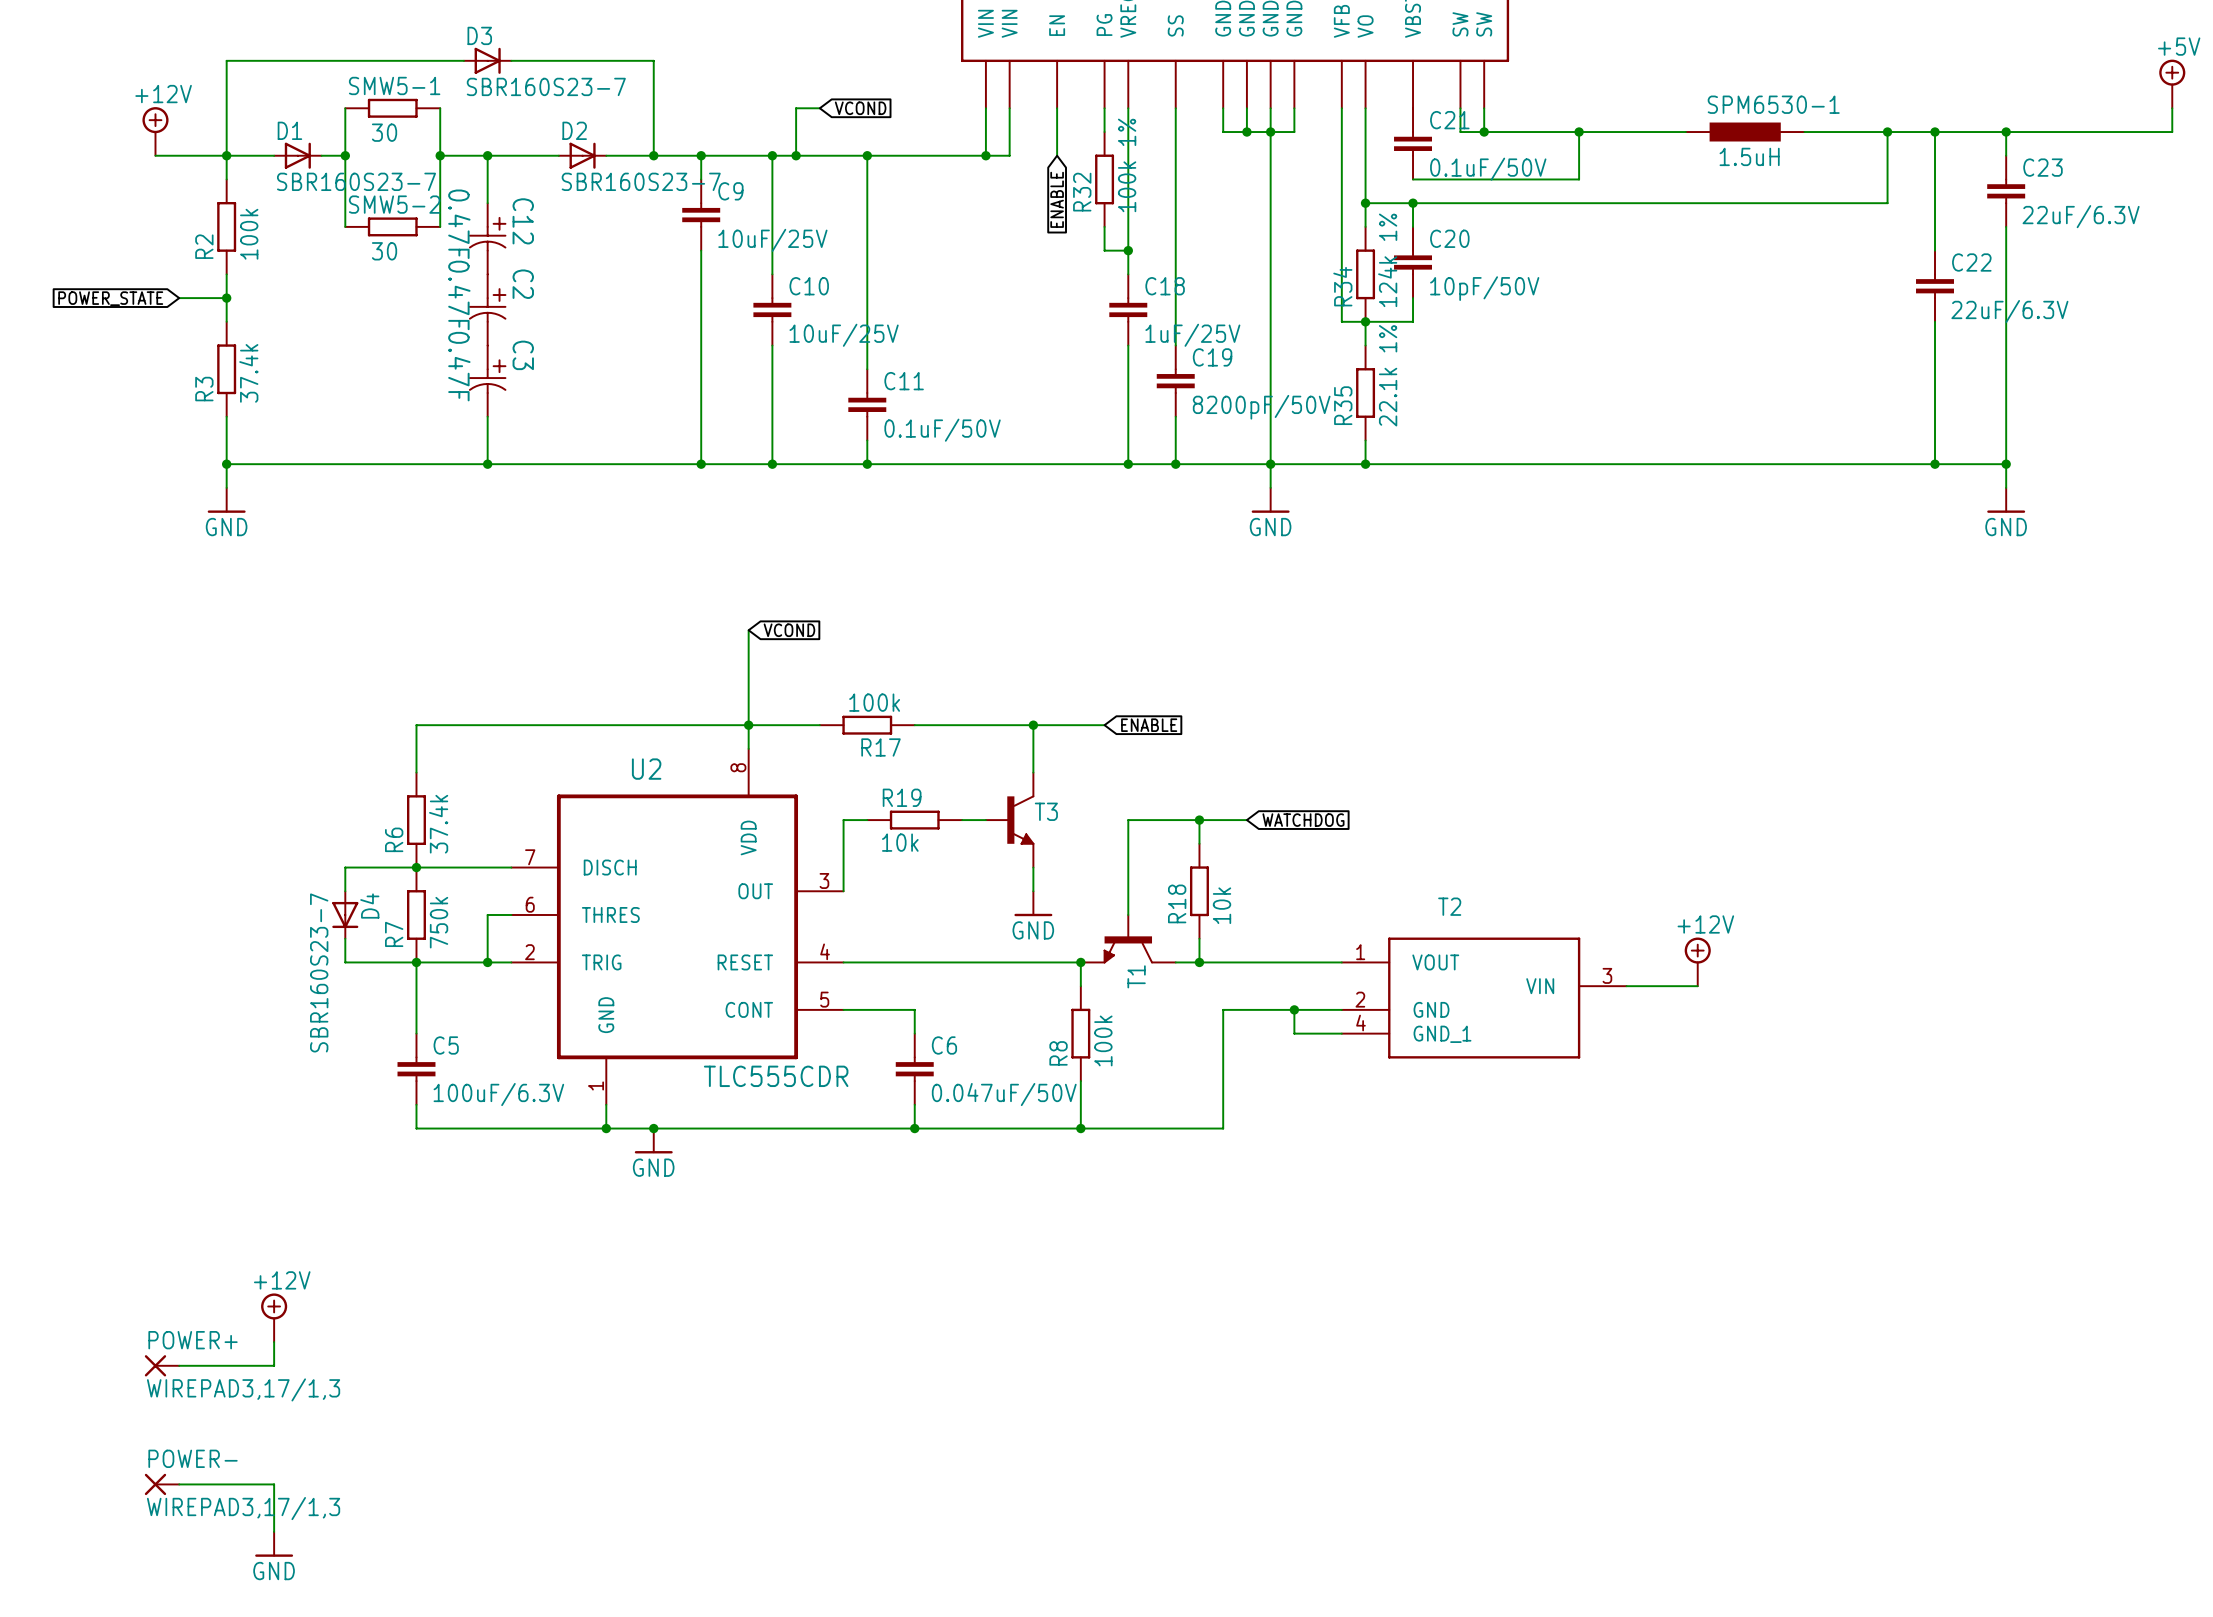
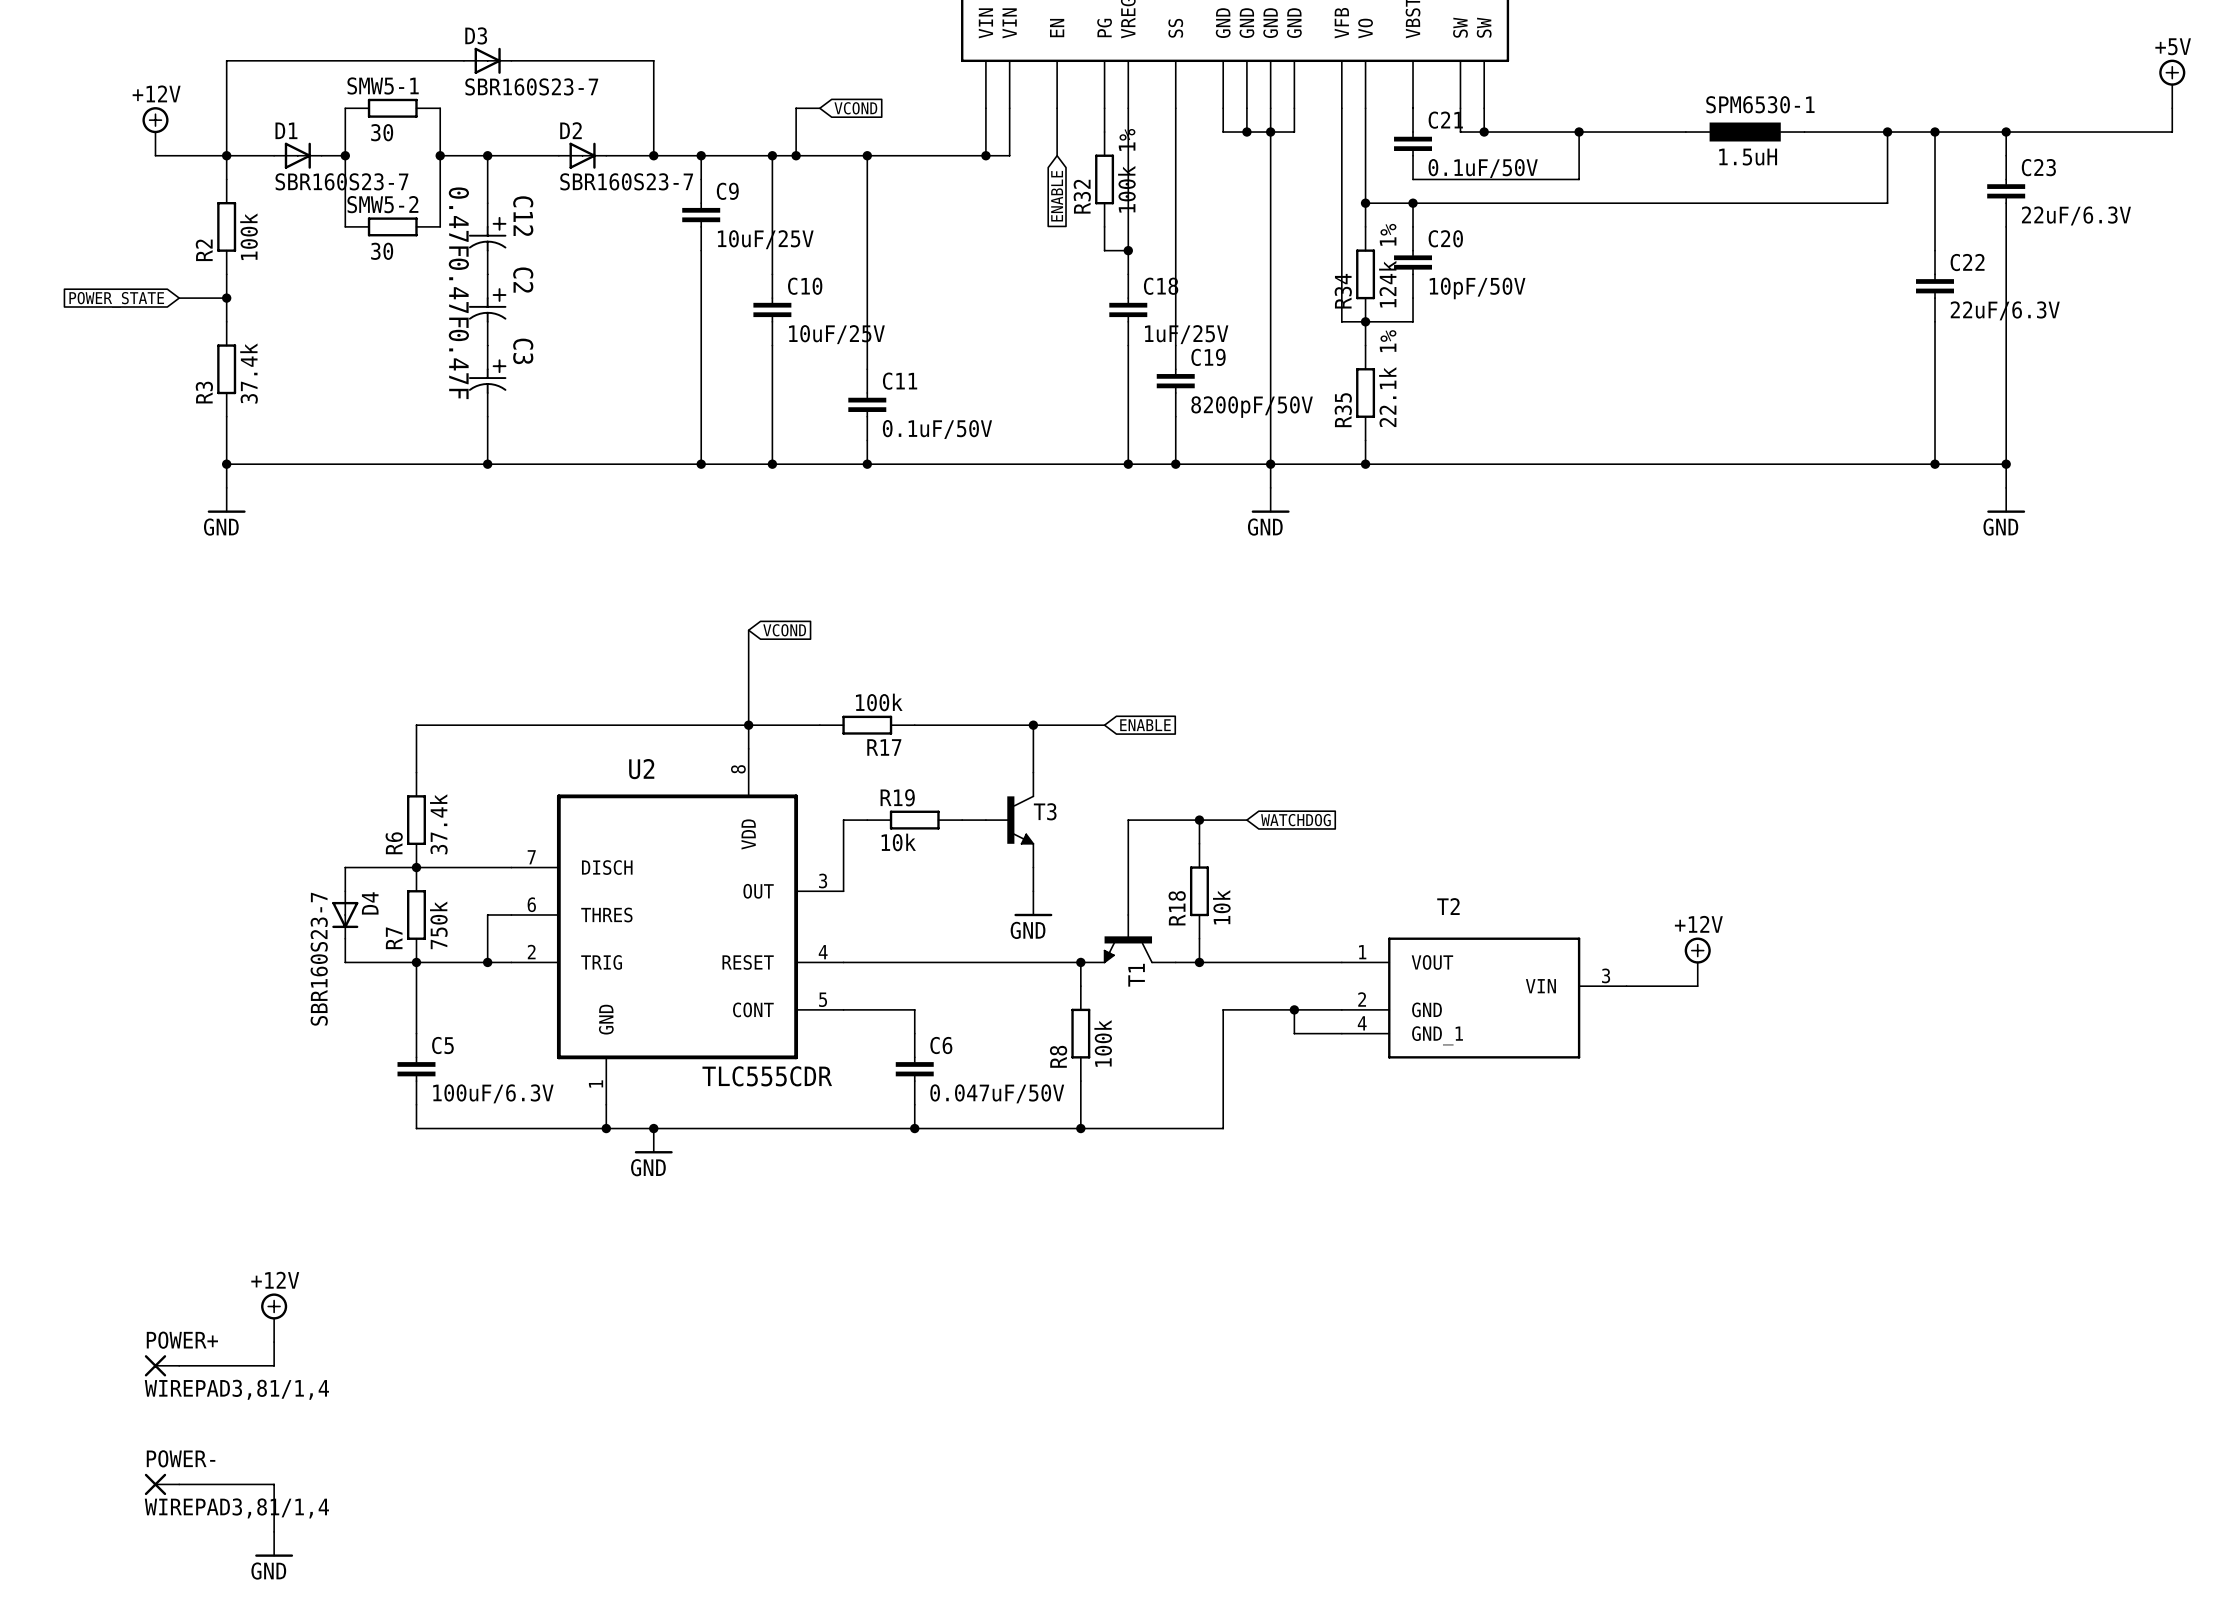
POWER+ value: WIREPAD3,17/1,3 (243, 1389) -> WIREPAD3,81/1,4 (236, 1389)
POWER- value: WIREPAD3,17/1,3 (243, 1508) -> WIREPAD3,81/1,4 (236, 1508)

